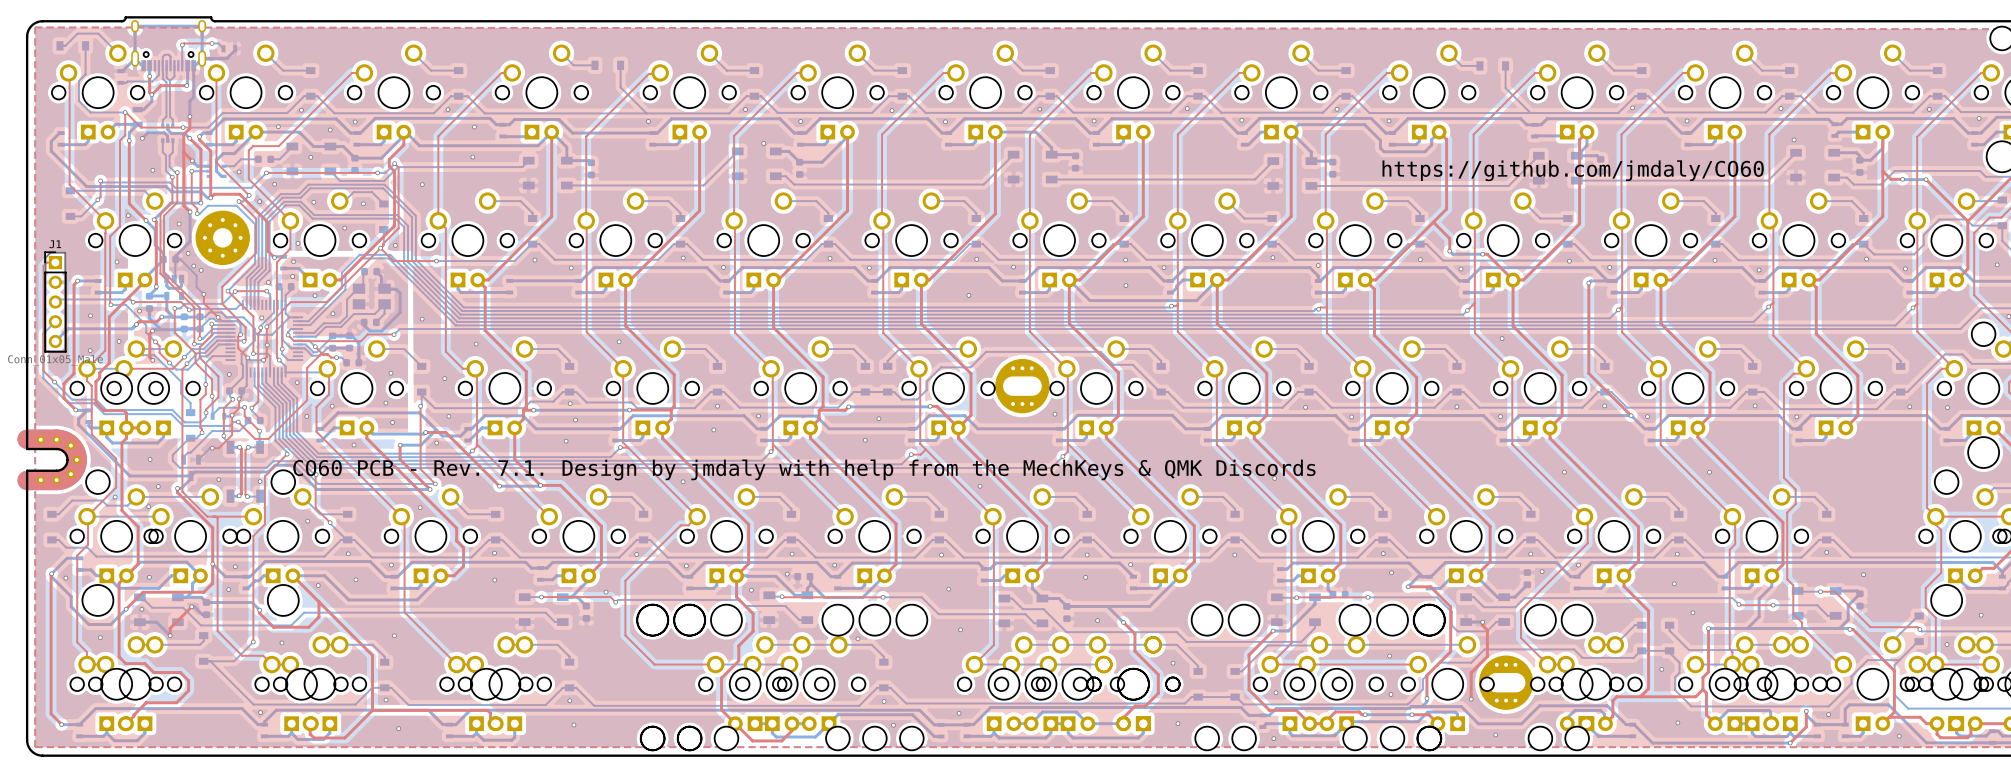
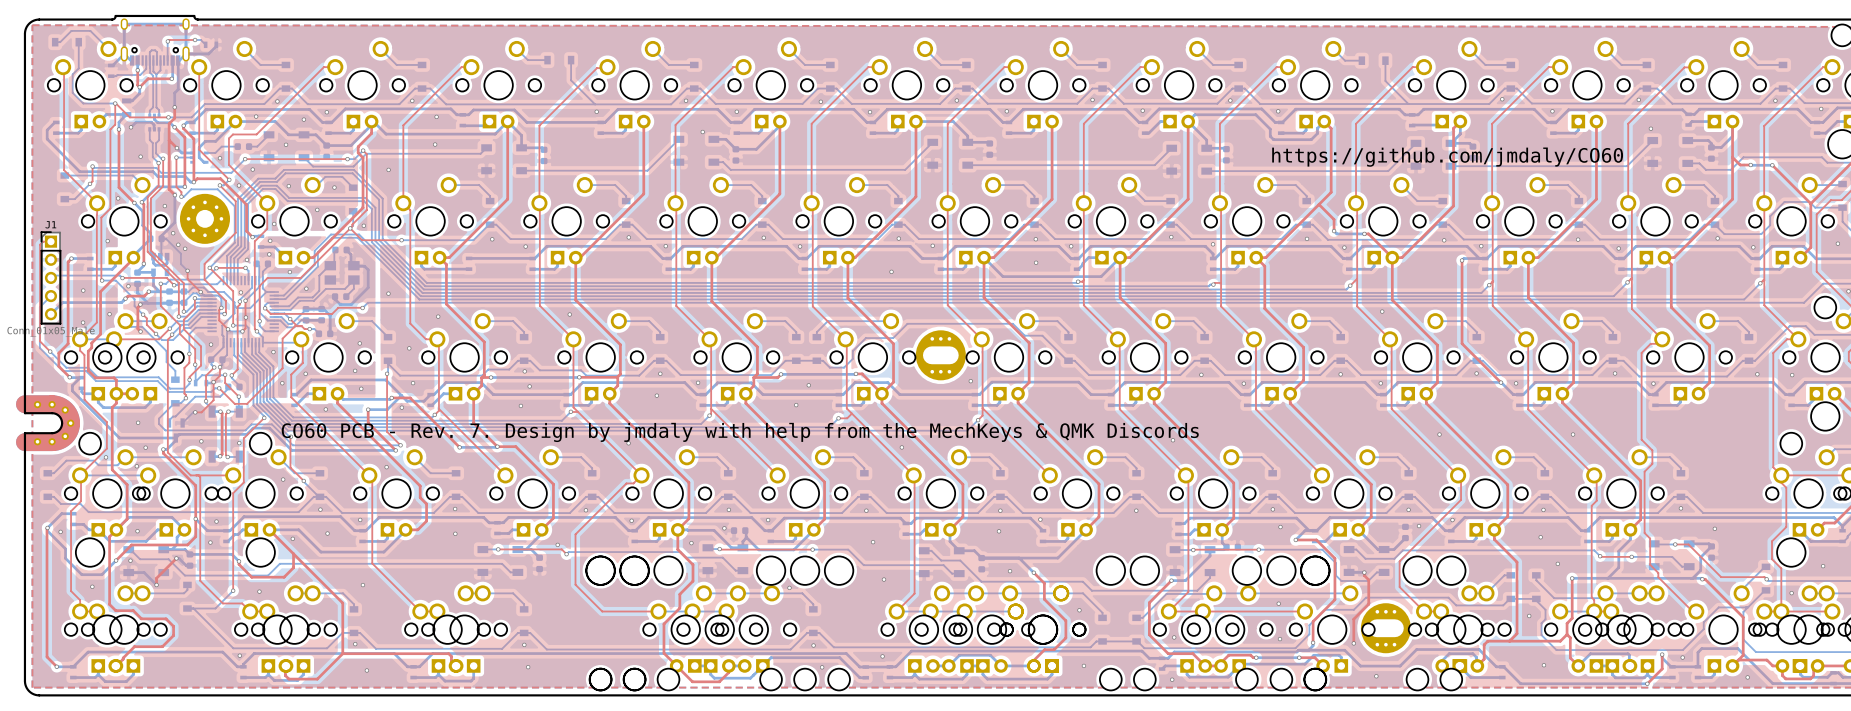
text: CO60 PCB - Rev. 7.1. Design by jmdaly with help from the MechKeys & QMK Discords (804, 469) -> CO60 PCB - Rev. 7. Design by jmdaly with help from the MechKeys & QMK Discords (740, 432)

